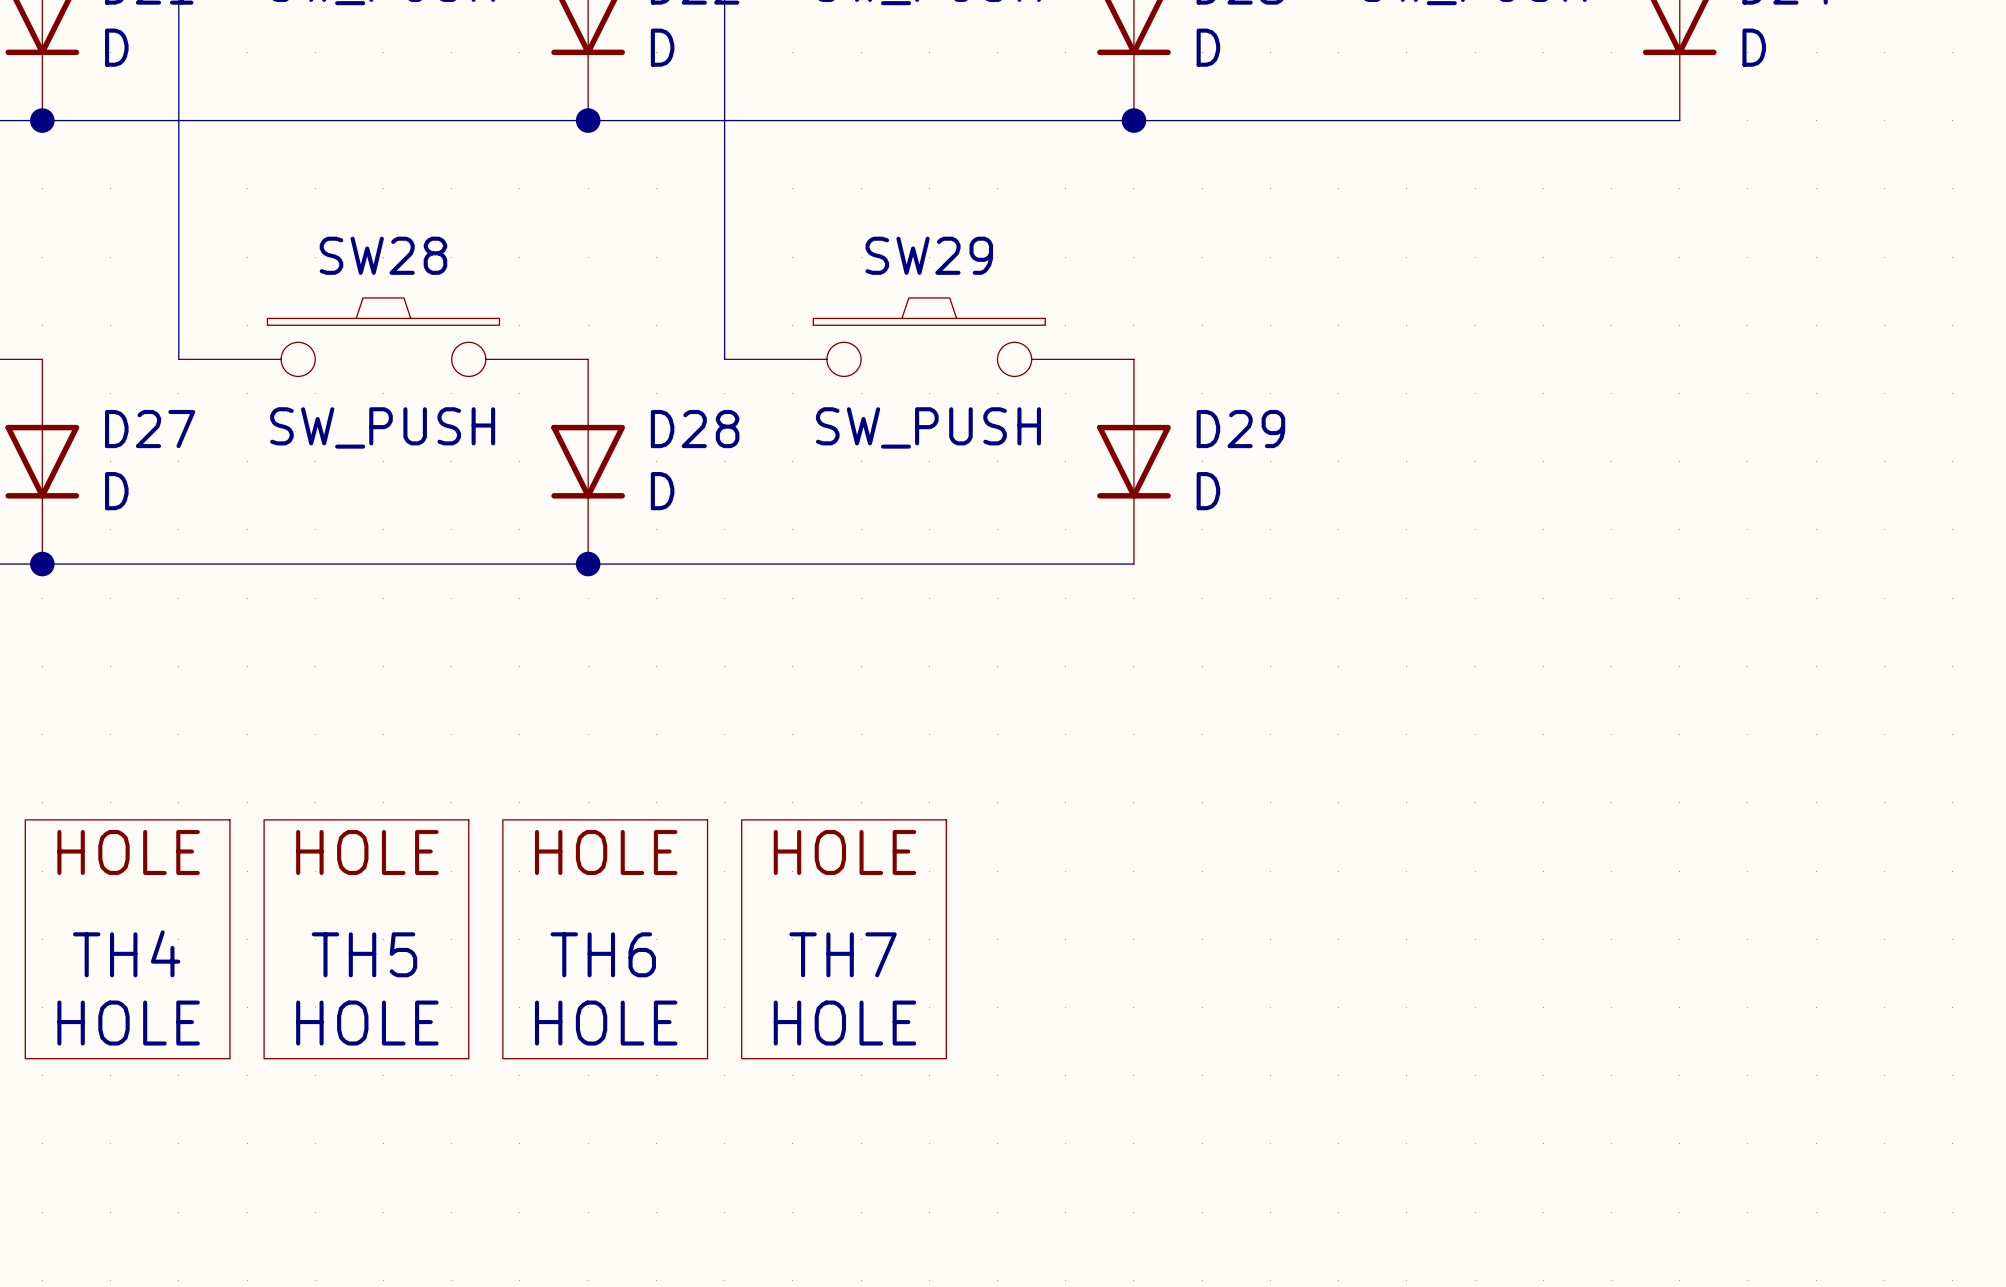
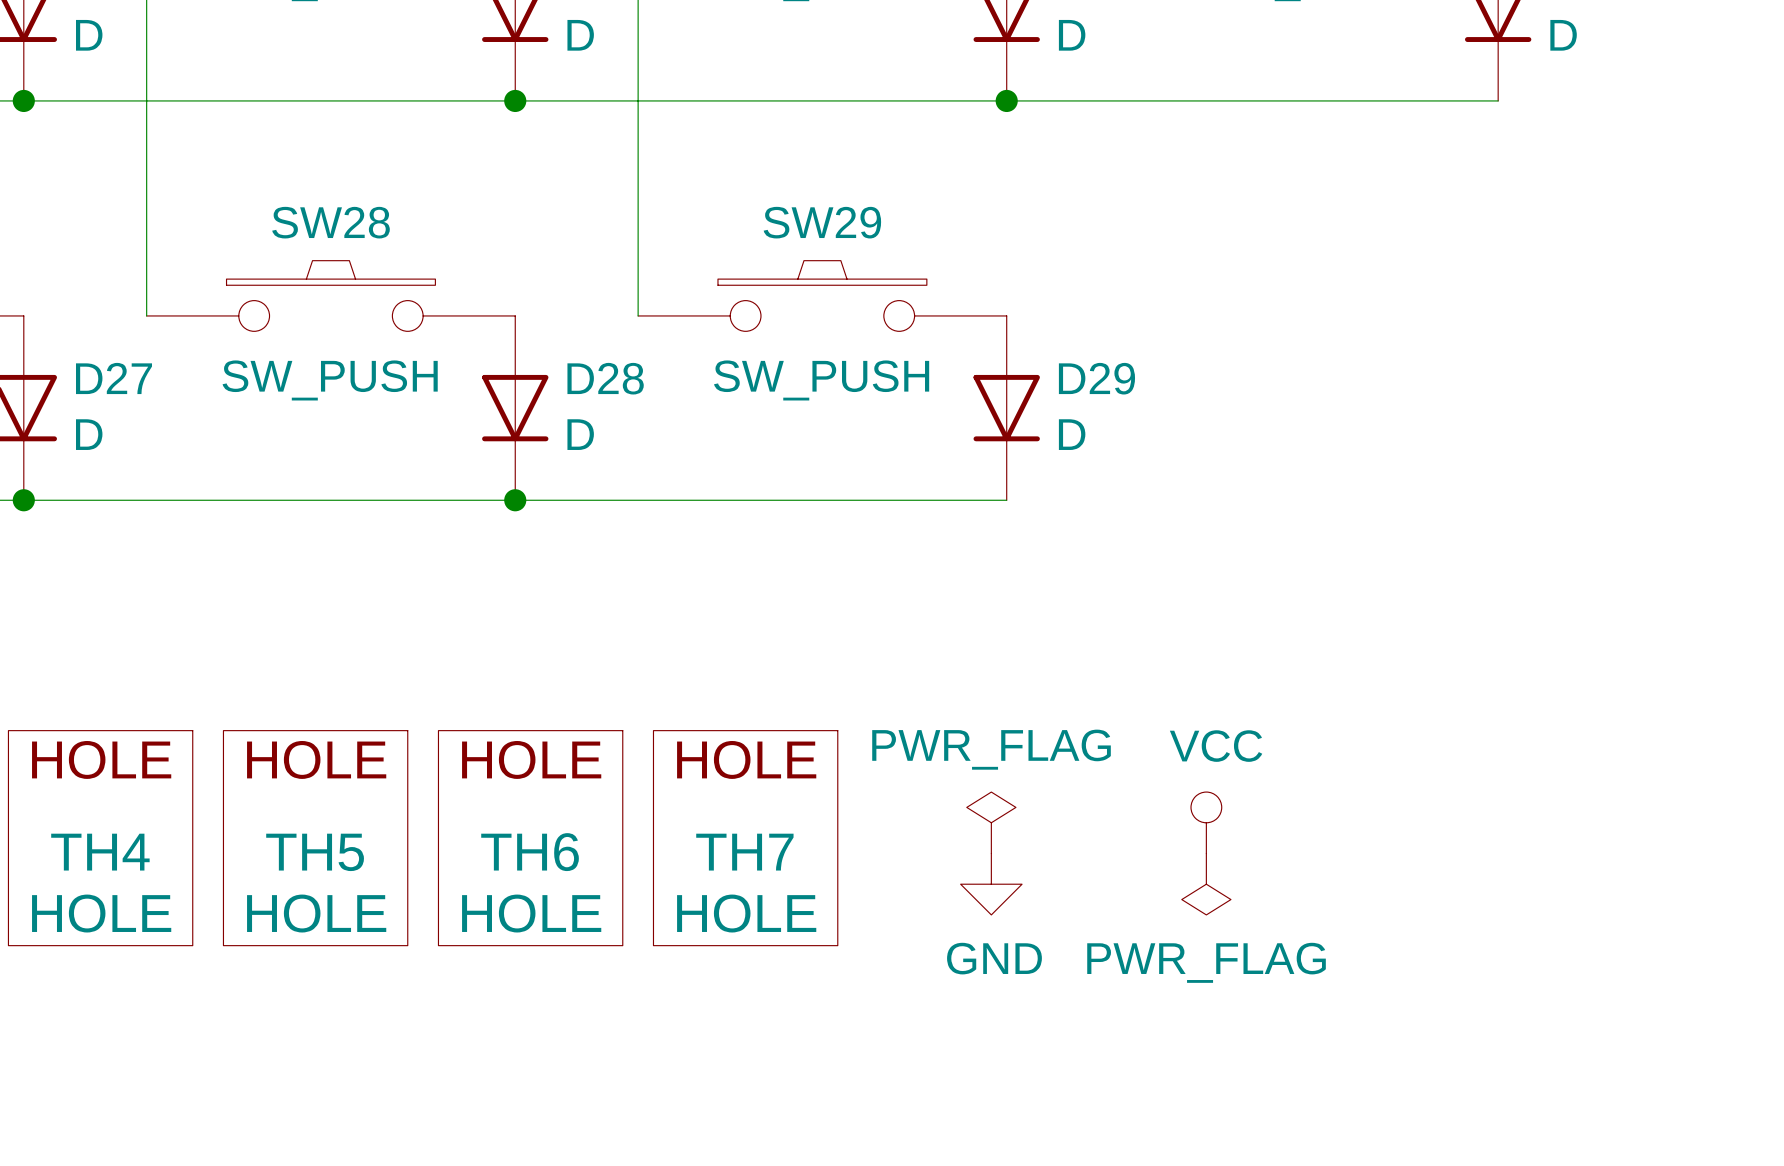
power symbol: none -> PWR_FLAG (991, 822)
power symbol: none -> VCC (1206, 822)
power symbol: none -> GND (991, 884)
power symbol: none -> PWR_FLAG (1206, 884)

